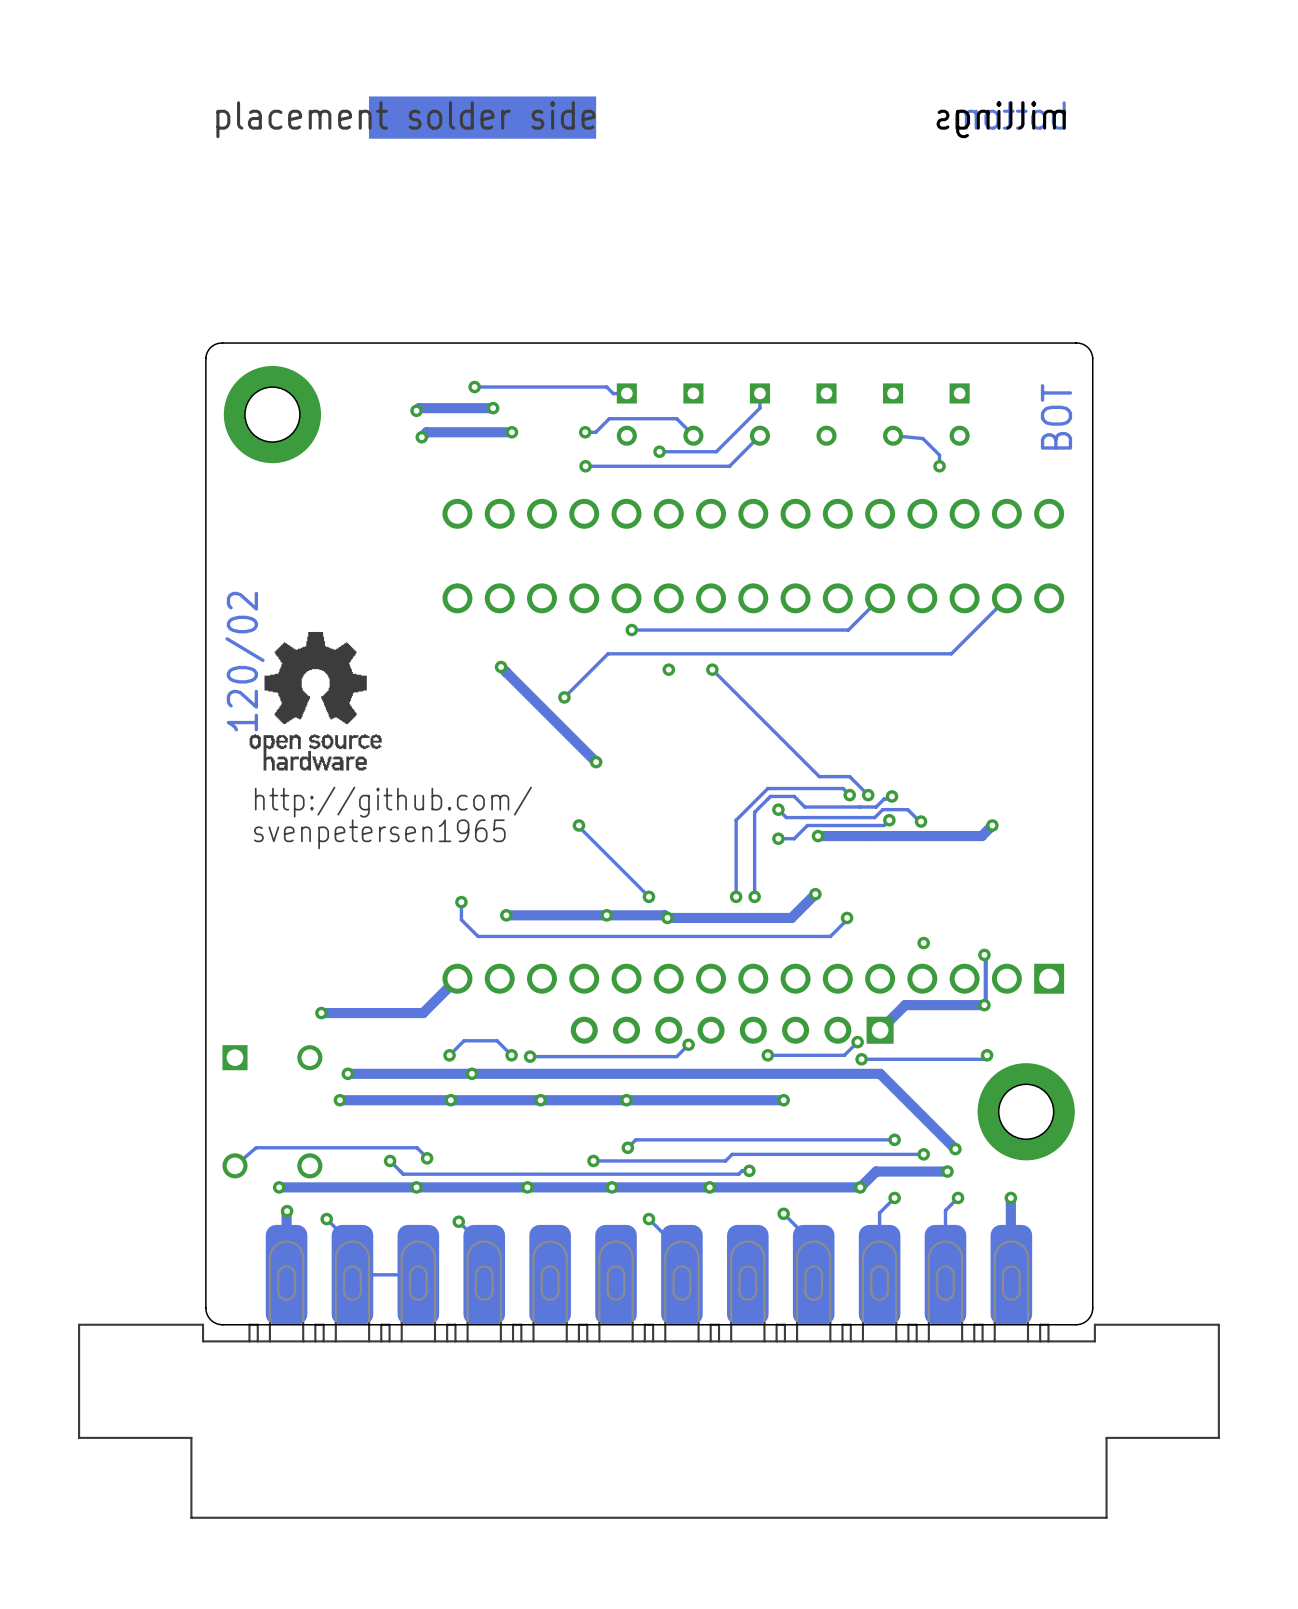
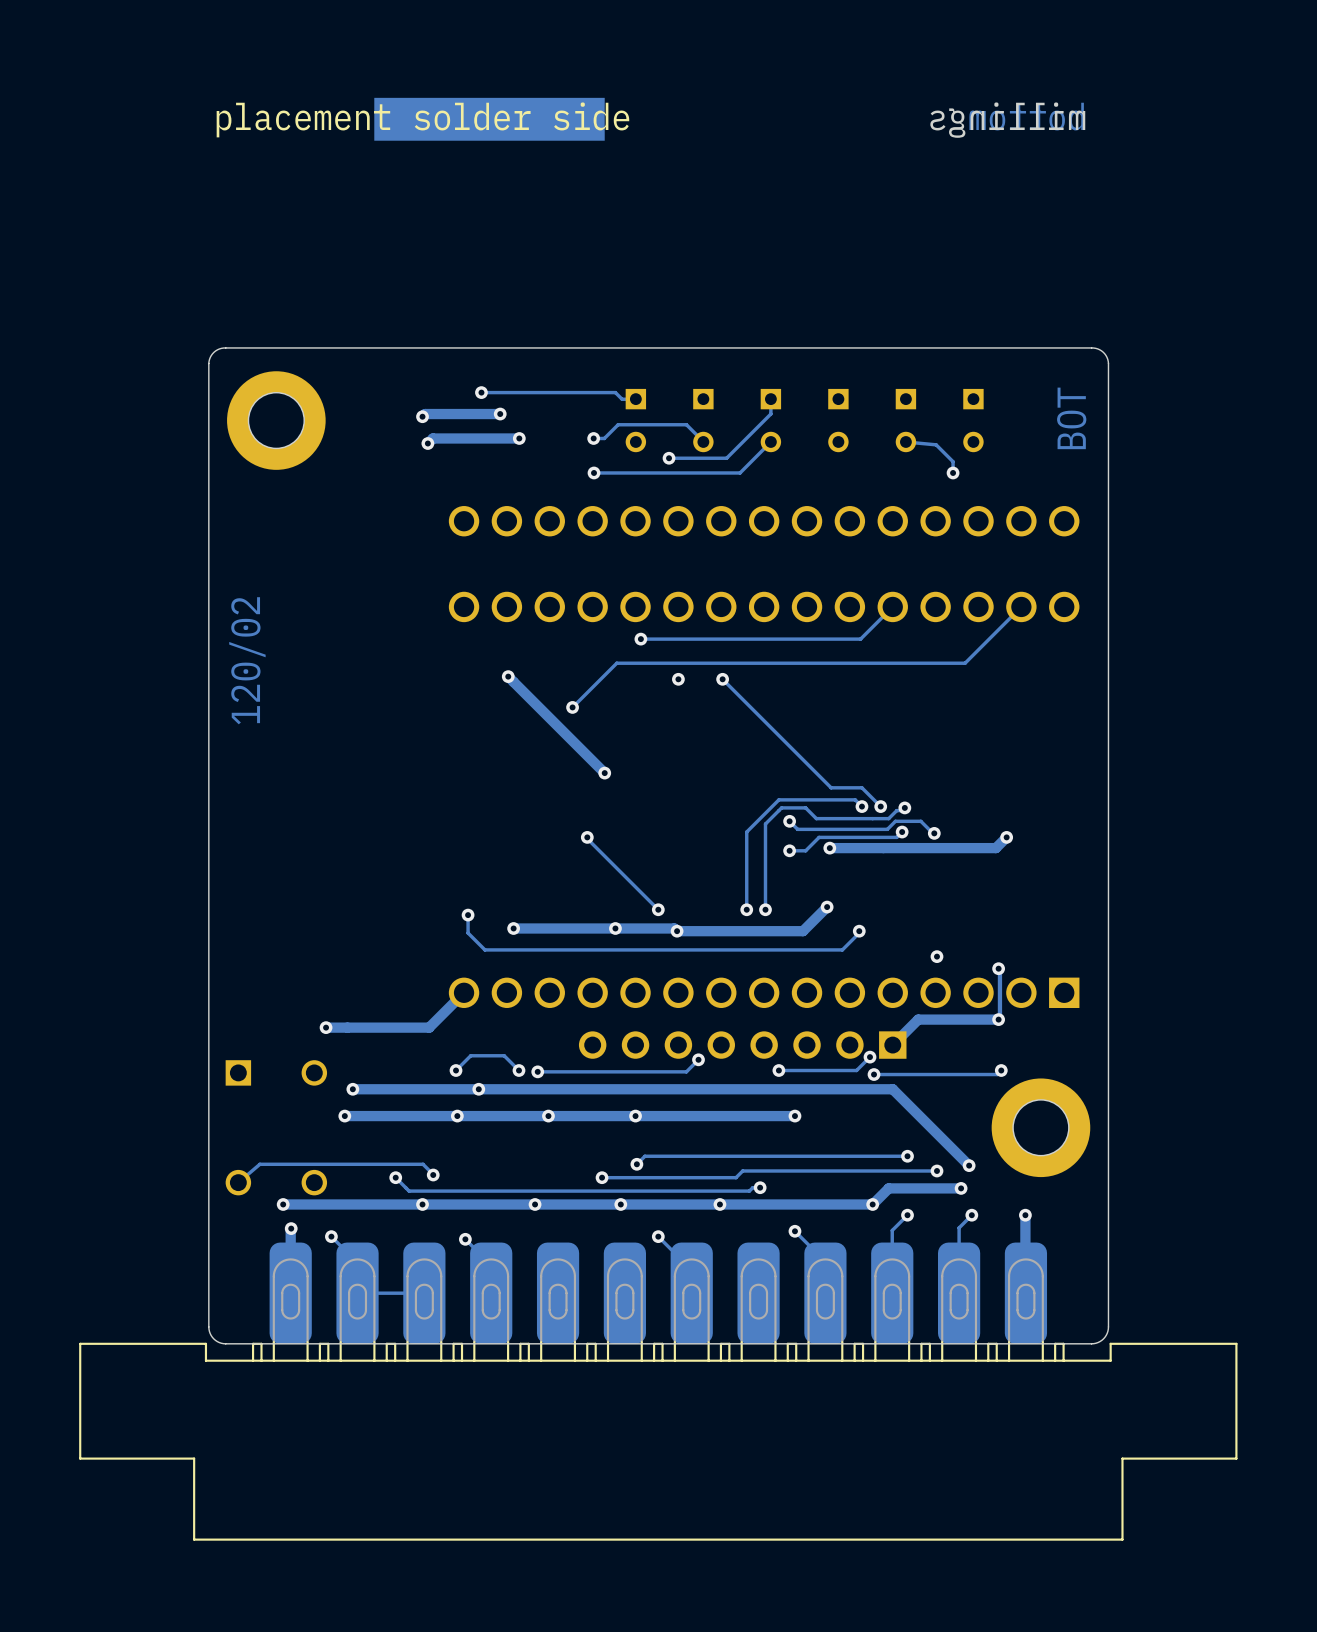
drawing: [249, 631, 382, 771] -> none
text: http://github.com/ (393, 802) -> none
text: svenpetersen1965 (379, 834) -> none

